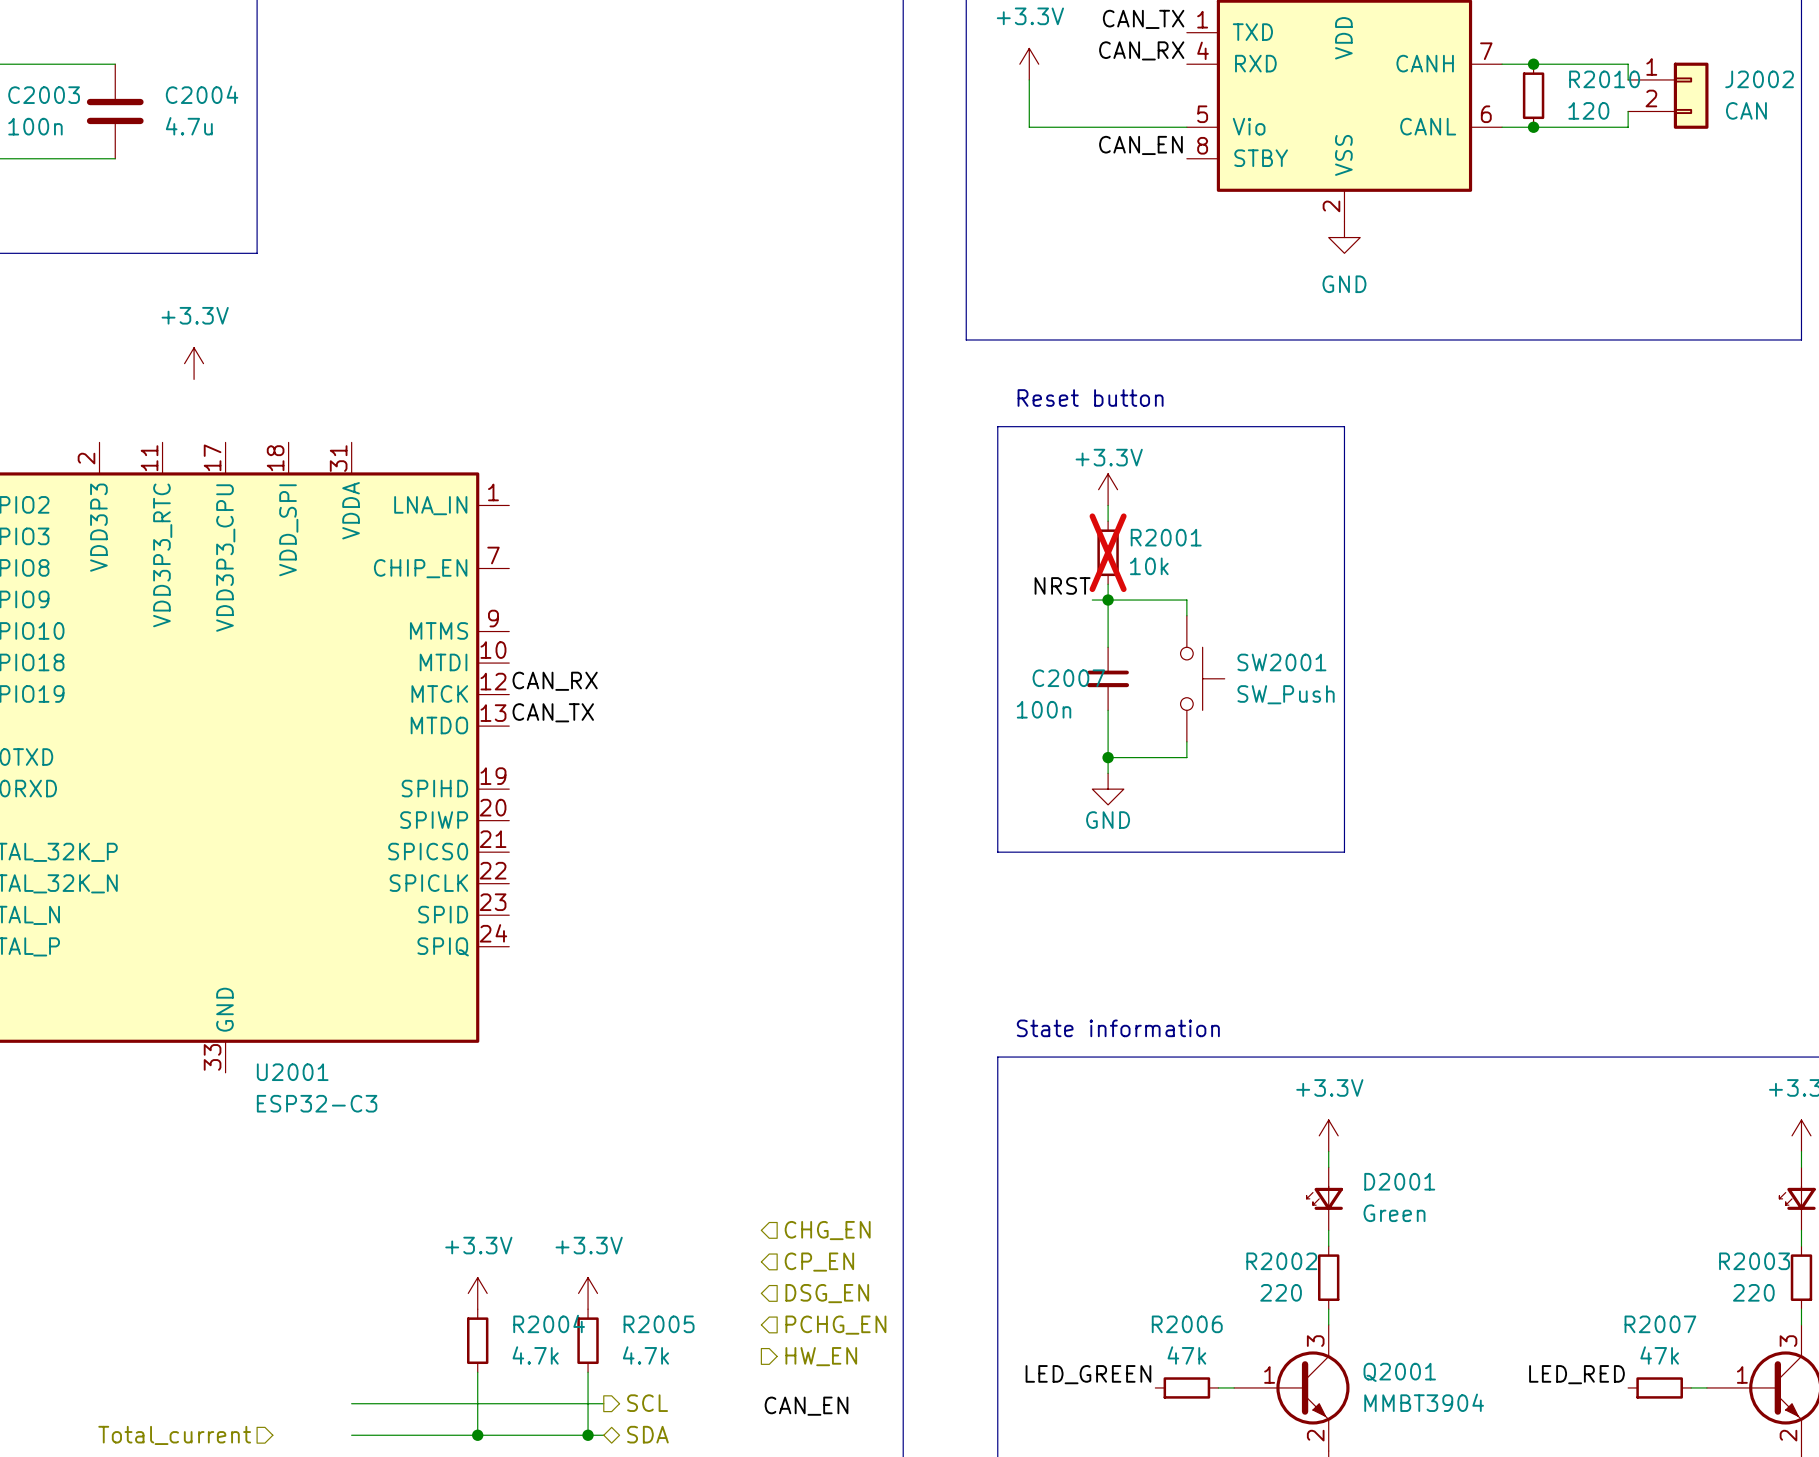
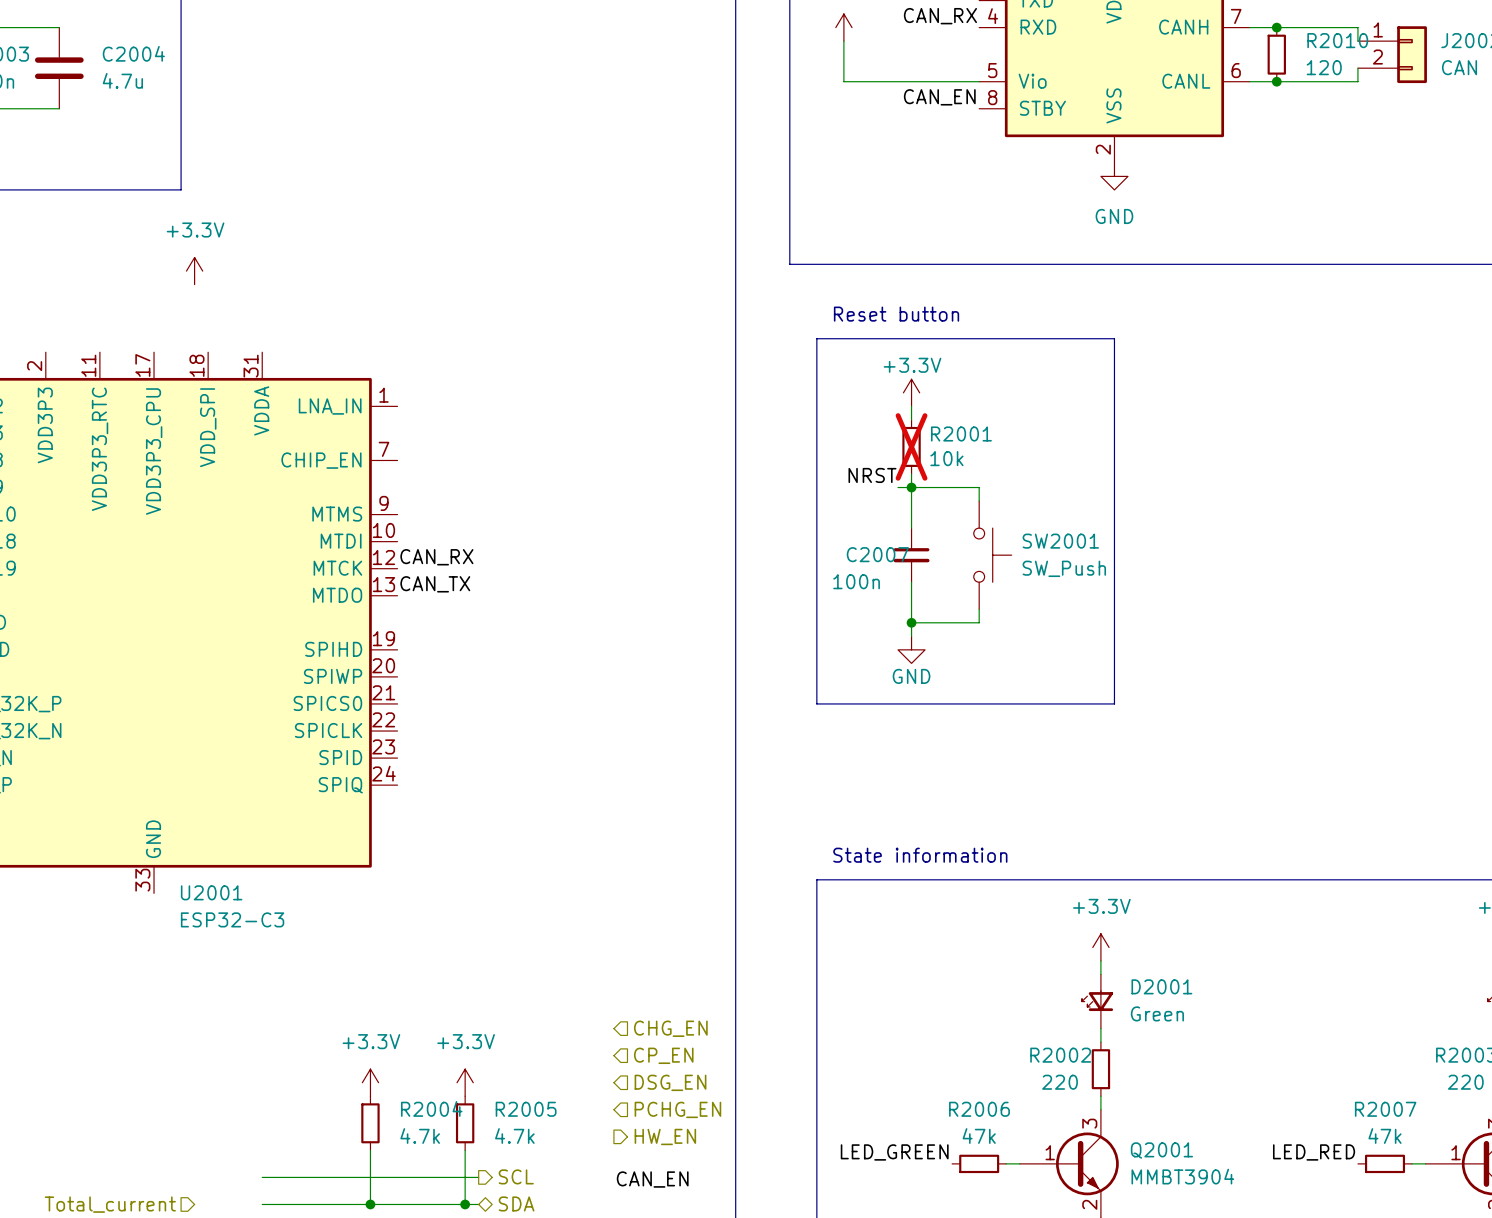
power symbol position: +3.3V (194, 363) -> +3.3V (194, 271)

